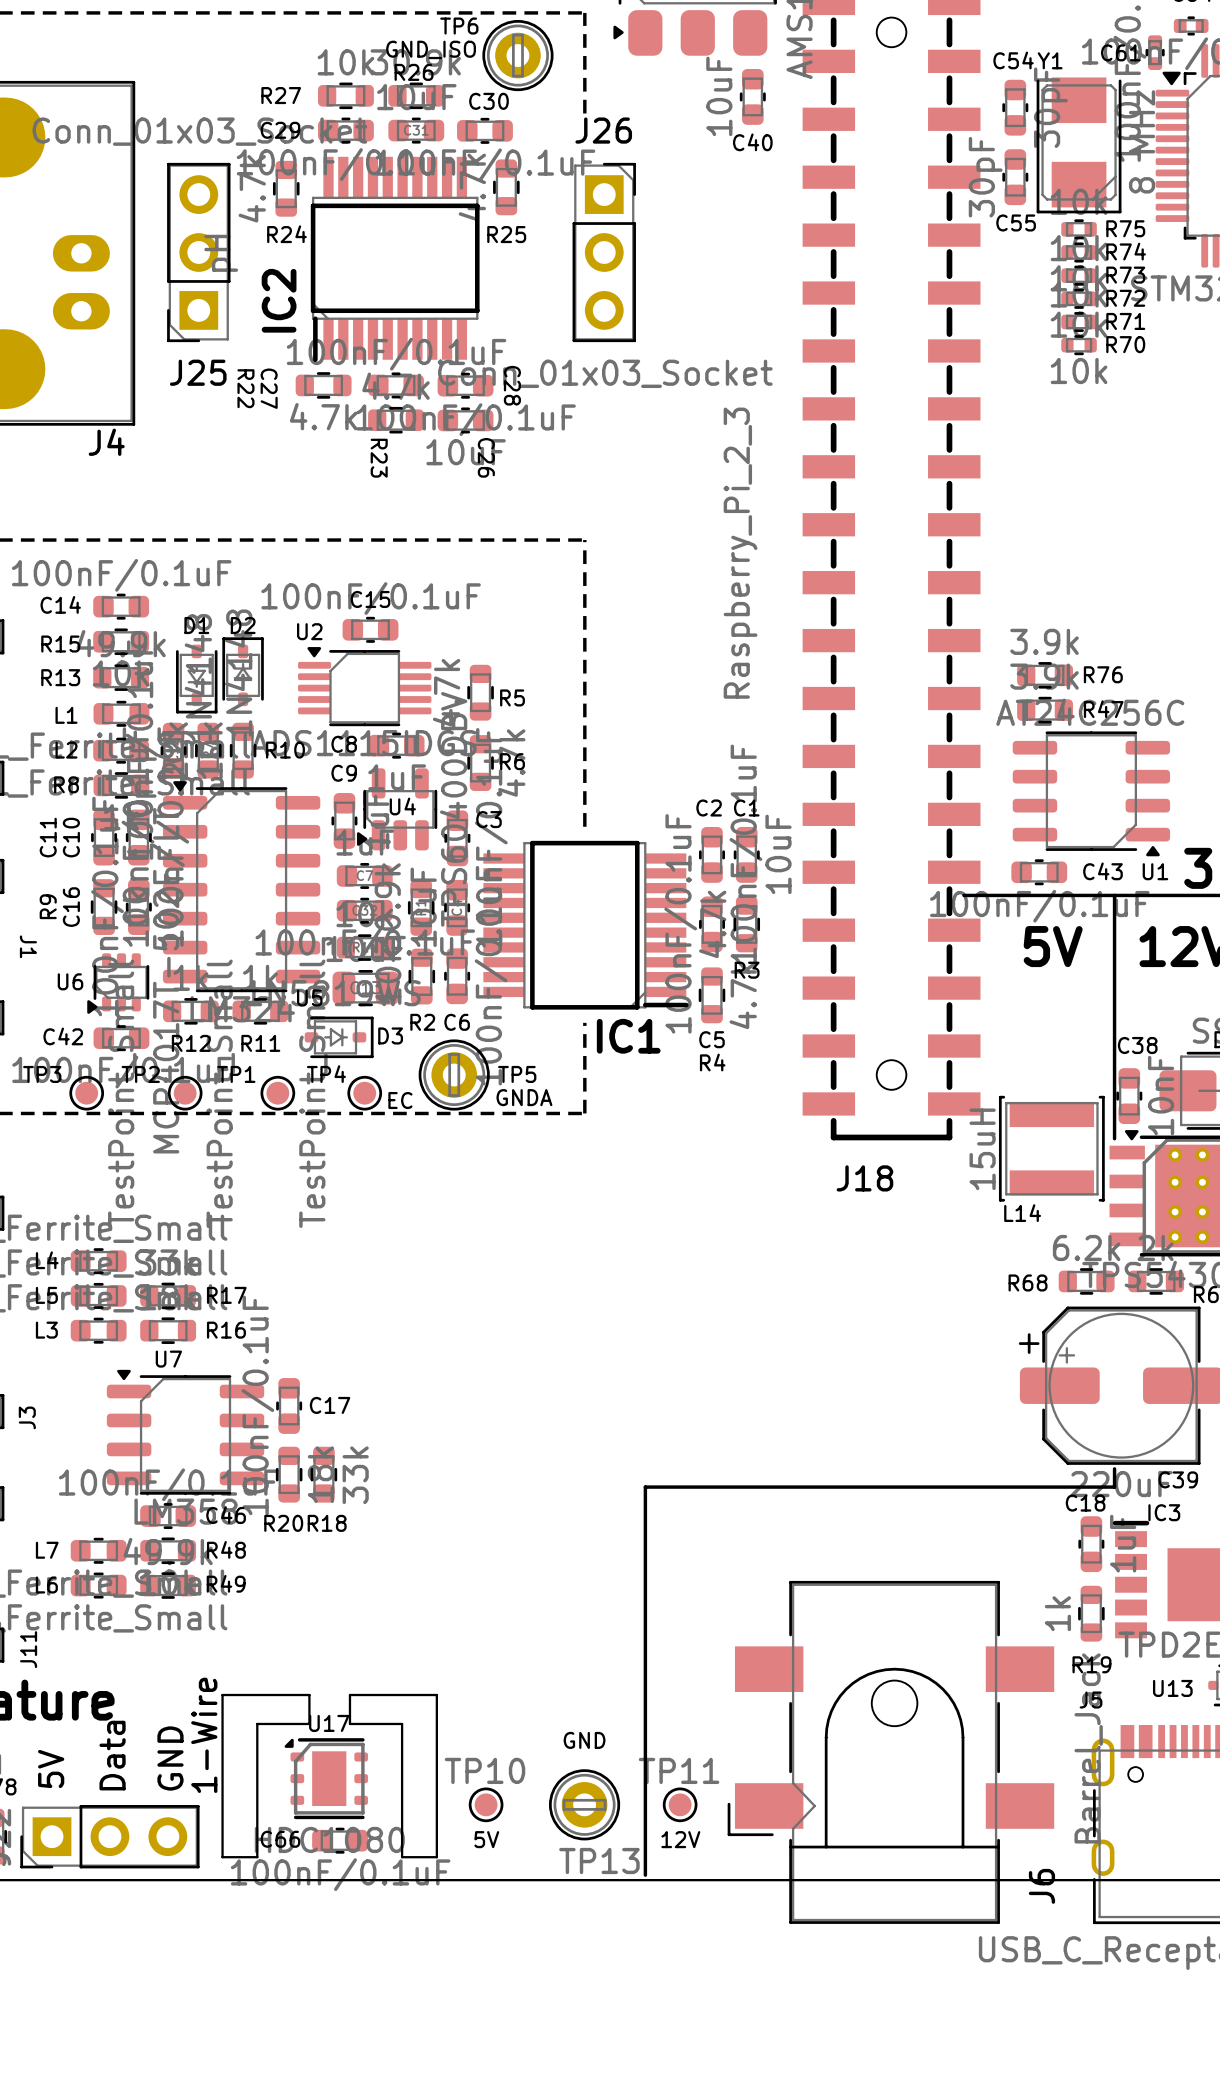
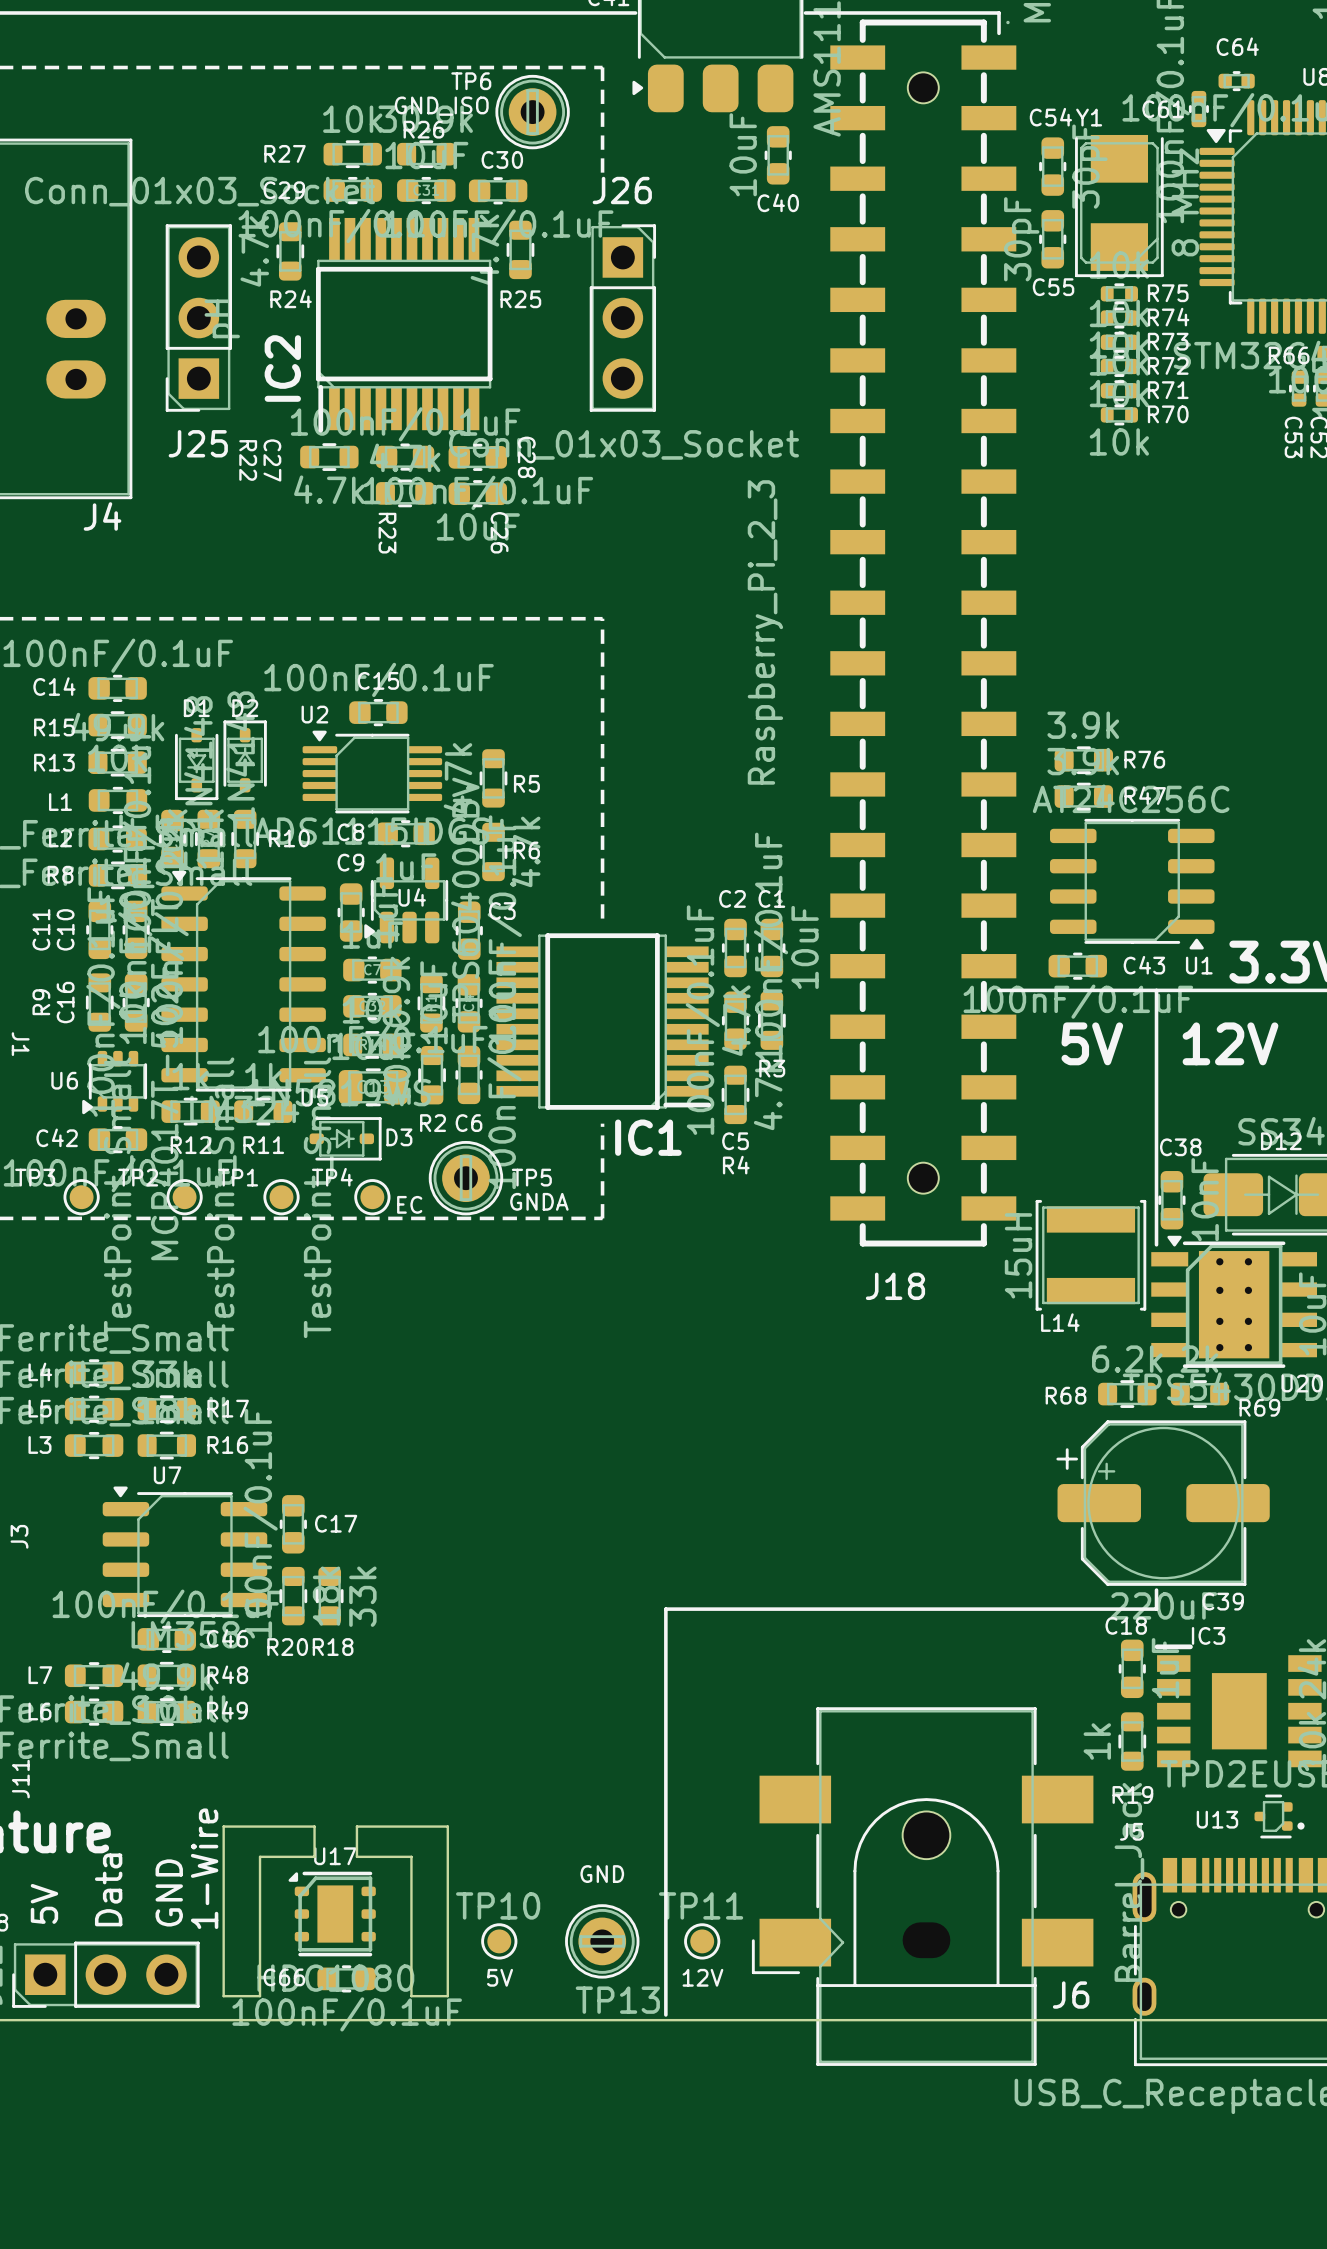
J6 name rotation: 0° (1041, 1886) -> 90° clockwise (1071, 1995)

